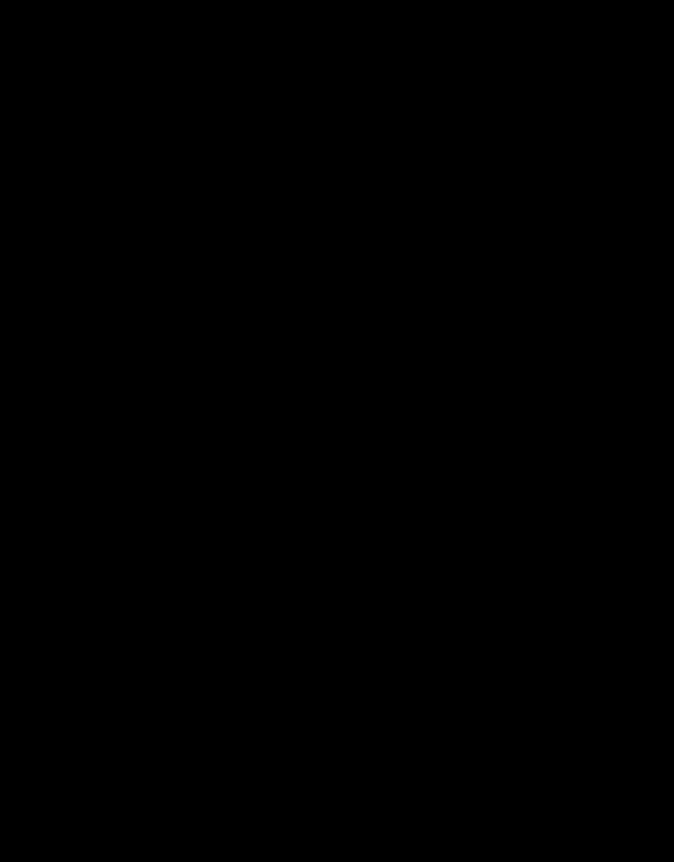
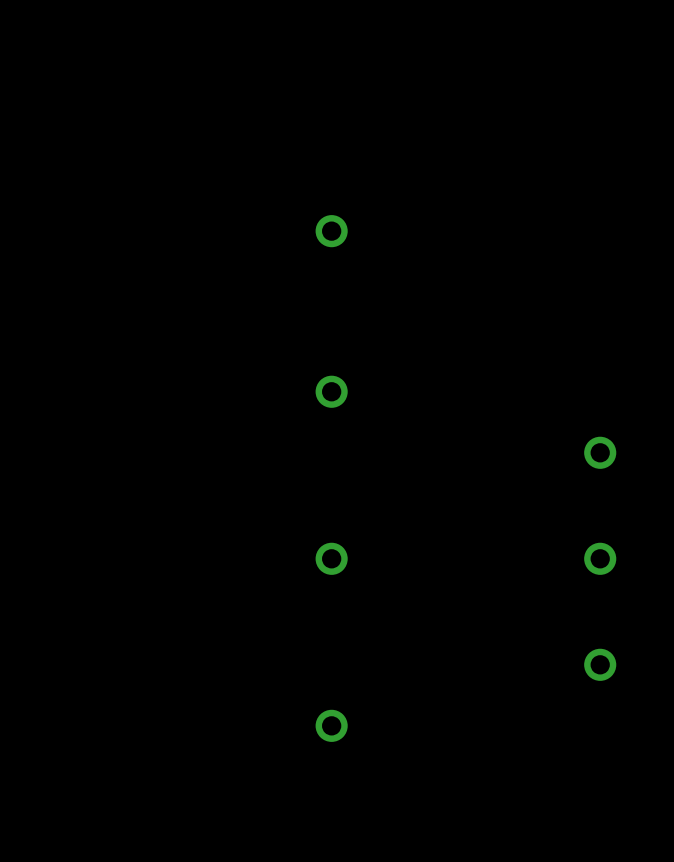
via: none -> (331, 231)
via: none -> (331, 391)
via: none -> (600, 452)
via: none -> (331, 558)
via: none -> (600, 558)
via: none -> (600, 664)
via: none -> (331, 725)

